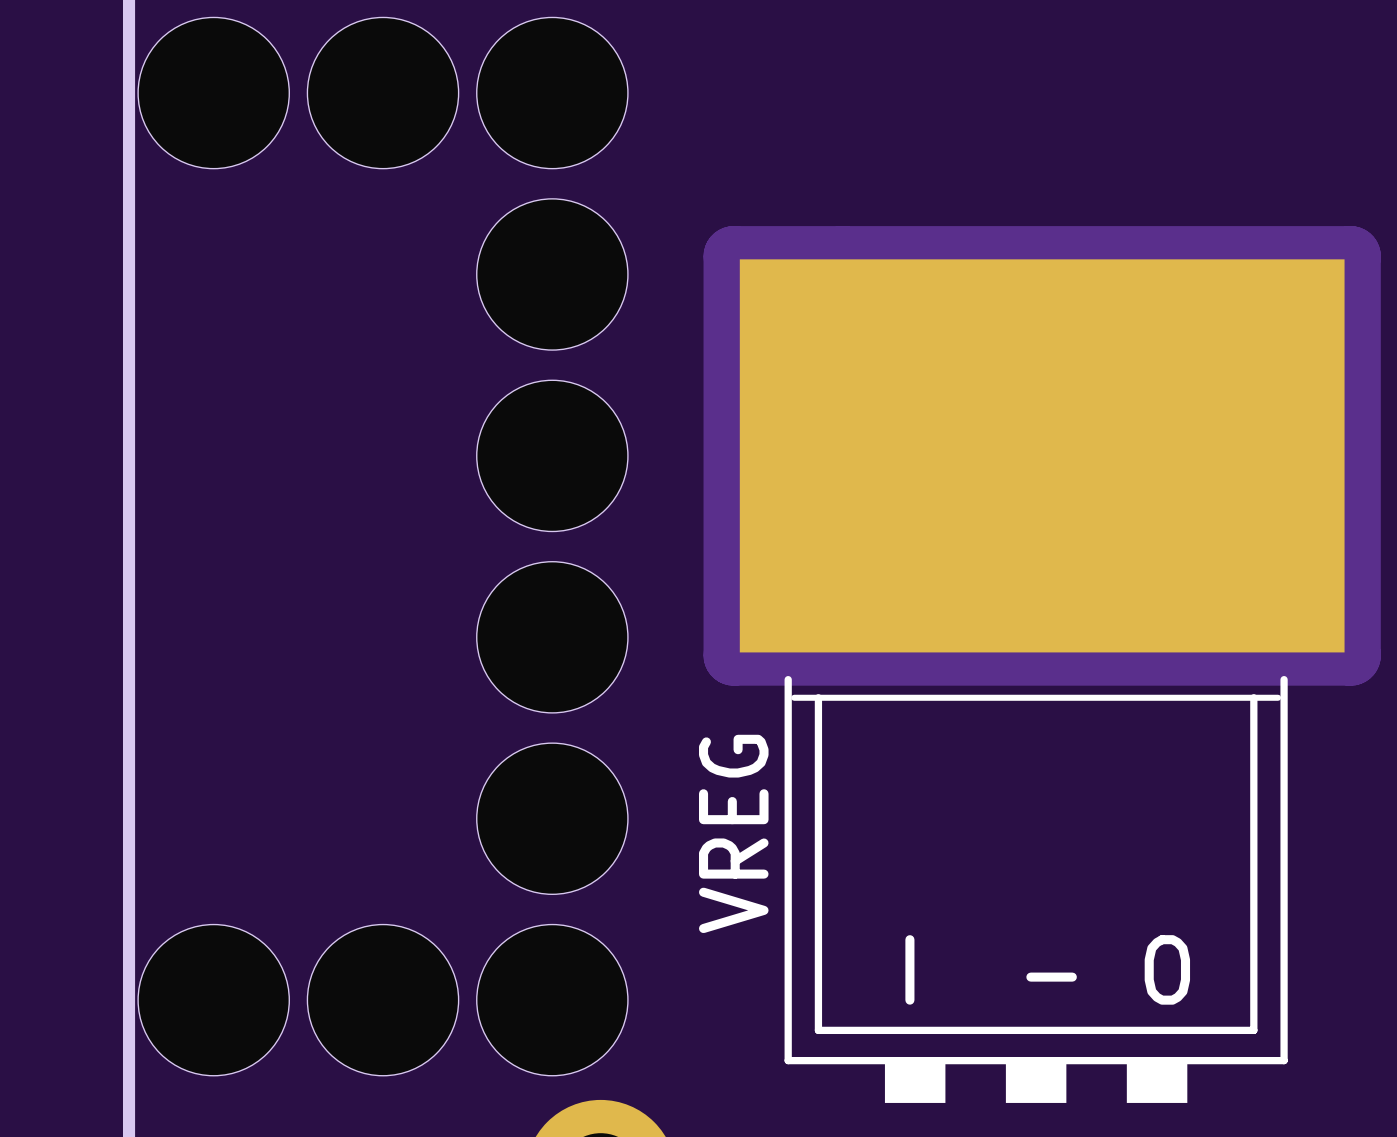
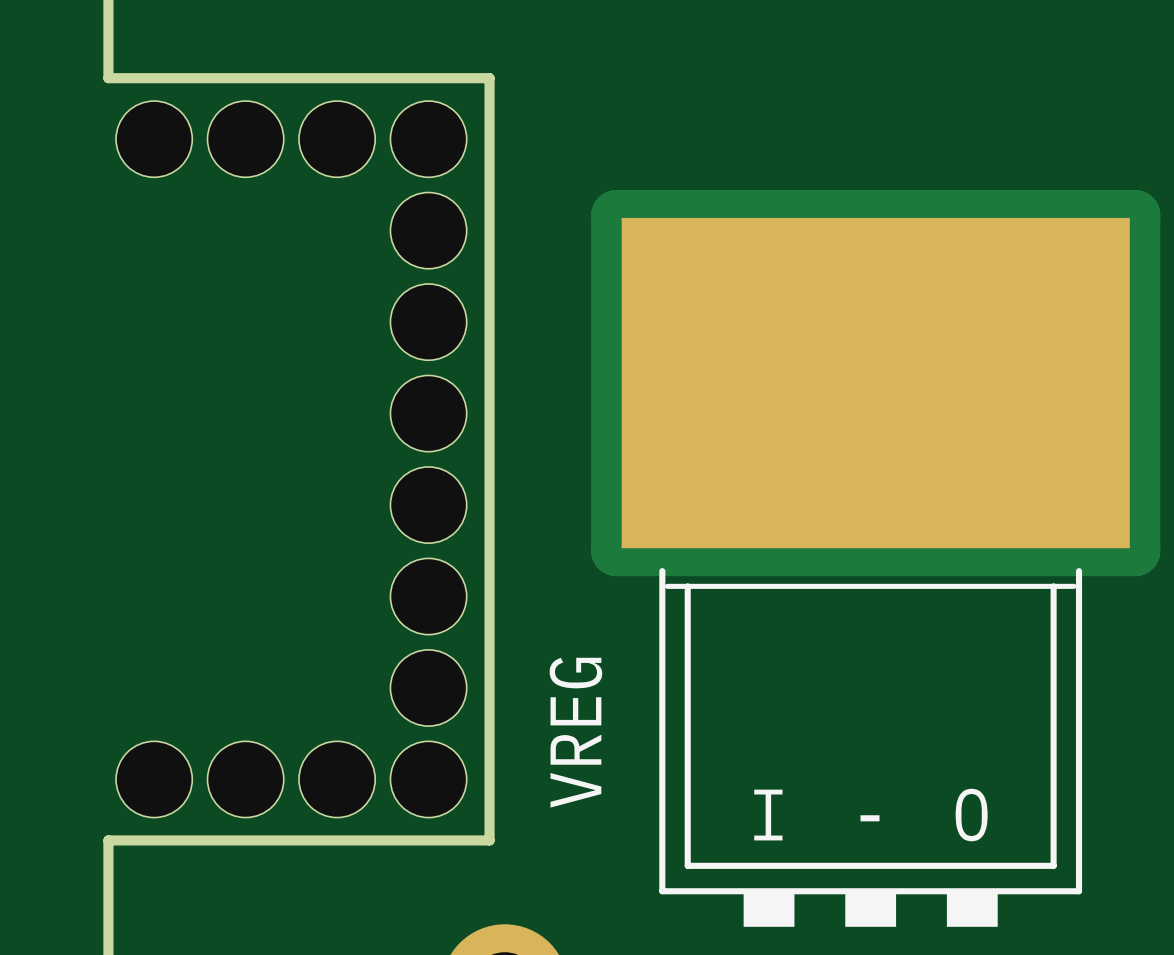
board edge: (129, 93) (129, 1000) -> (108, 78) (489, 78) (489, 840) (108, 840)
hole: (213, 93) -> none
hole: (383, 93) -> none
hole: (552, 93) -> none
hole: none -> (154, 139)
hole: none -> (245, 139)
hole: none -> (337, 139)
hole: none -> (428, 139)
hole size: [476, 198, 628, 351] -> [390, 192, 467, 269]
hole: none -> (428, 322)
hole: (552, 455) -> none
hole: none -> (428, 413)
hole: none -> (428, 505)
hole: (552, 637) -> none
hole: none -> (428, 596)
hole size: [476, 743, 628, 895] -> [390, 649, 467, 727]
VREG name position: VREG (733, 833) -> VREG (575, 732)
hole: none -> (154, 779)
hole: none -> (245, 779)
hole: none -> (337, 779)
hole: none -> (428, 779)
hole: (213, 1000) -> none
hole: (383, 1000) -> none
hole: (552, 1000) -> none

